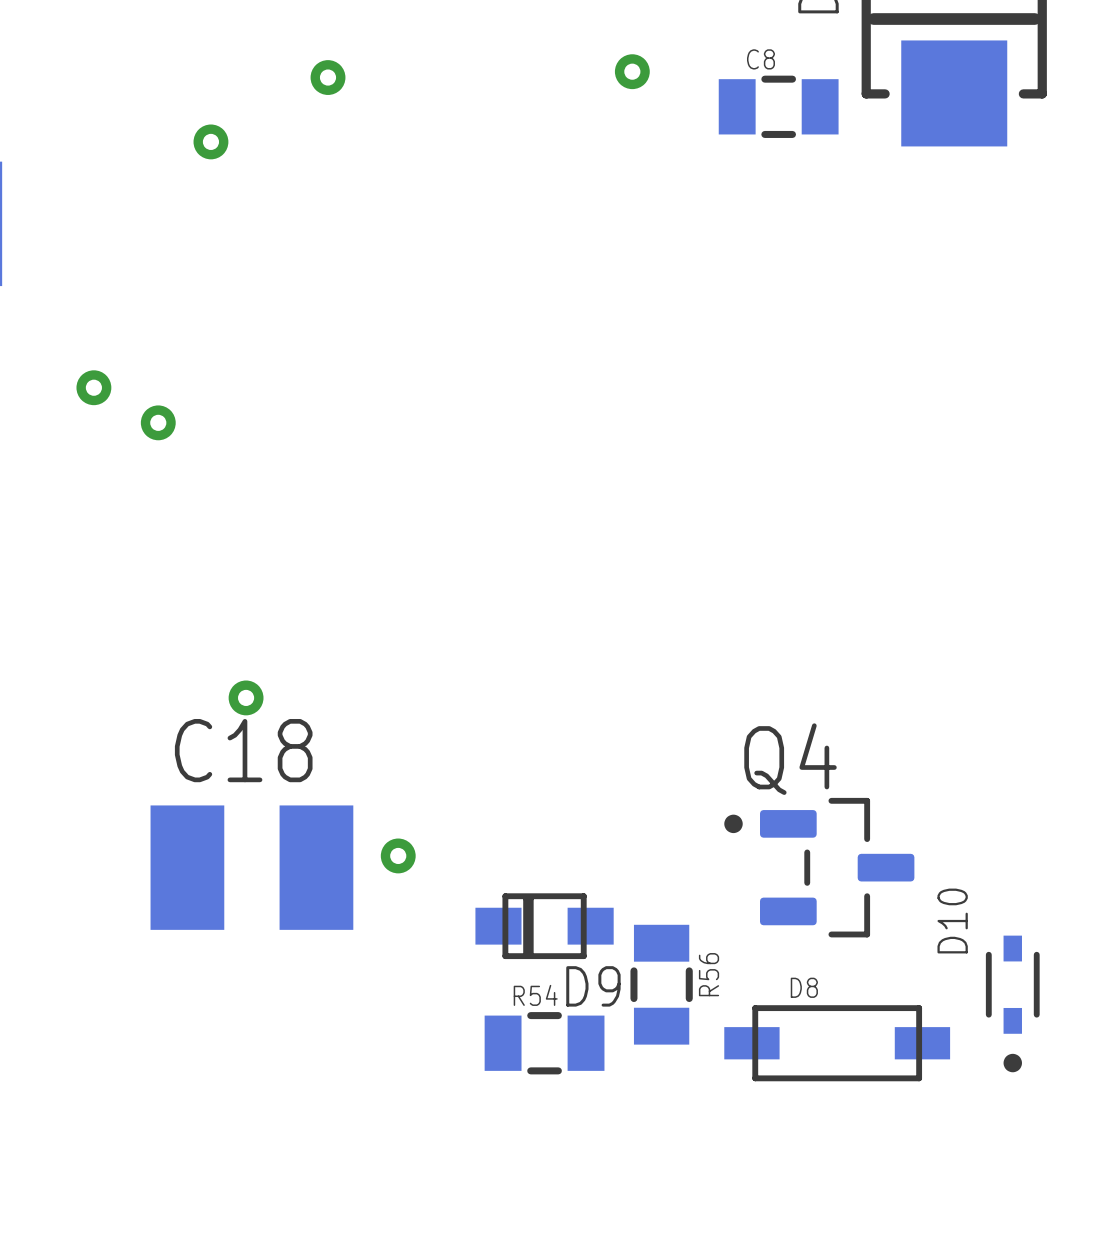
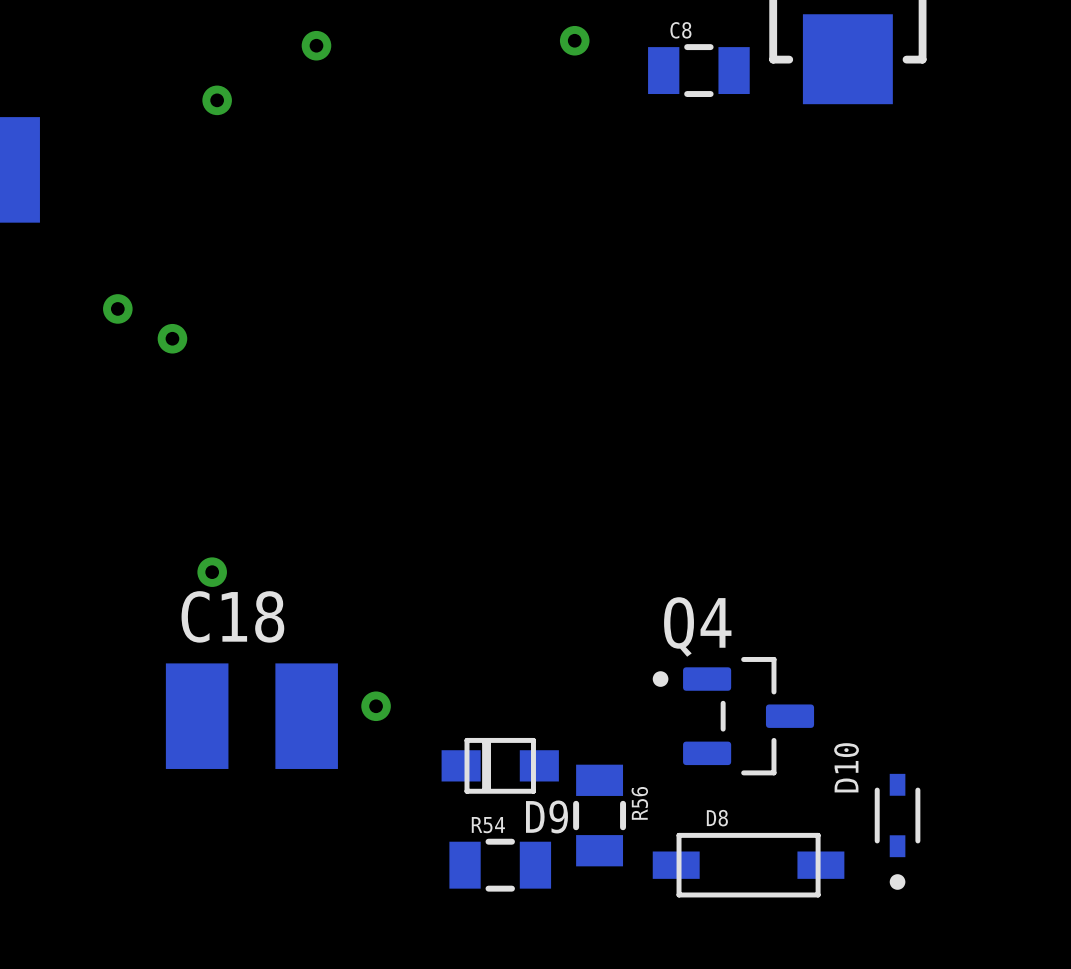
via position: (246, 697) -> (212, 572)

